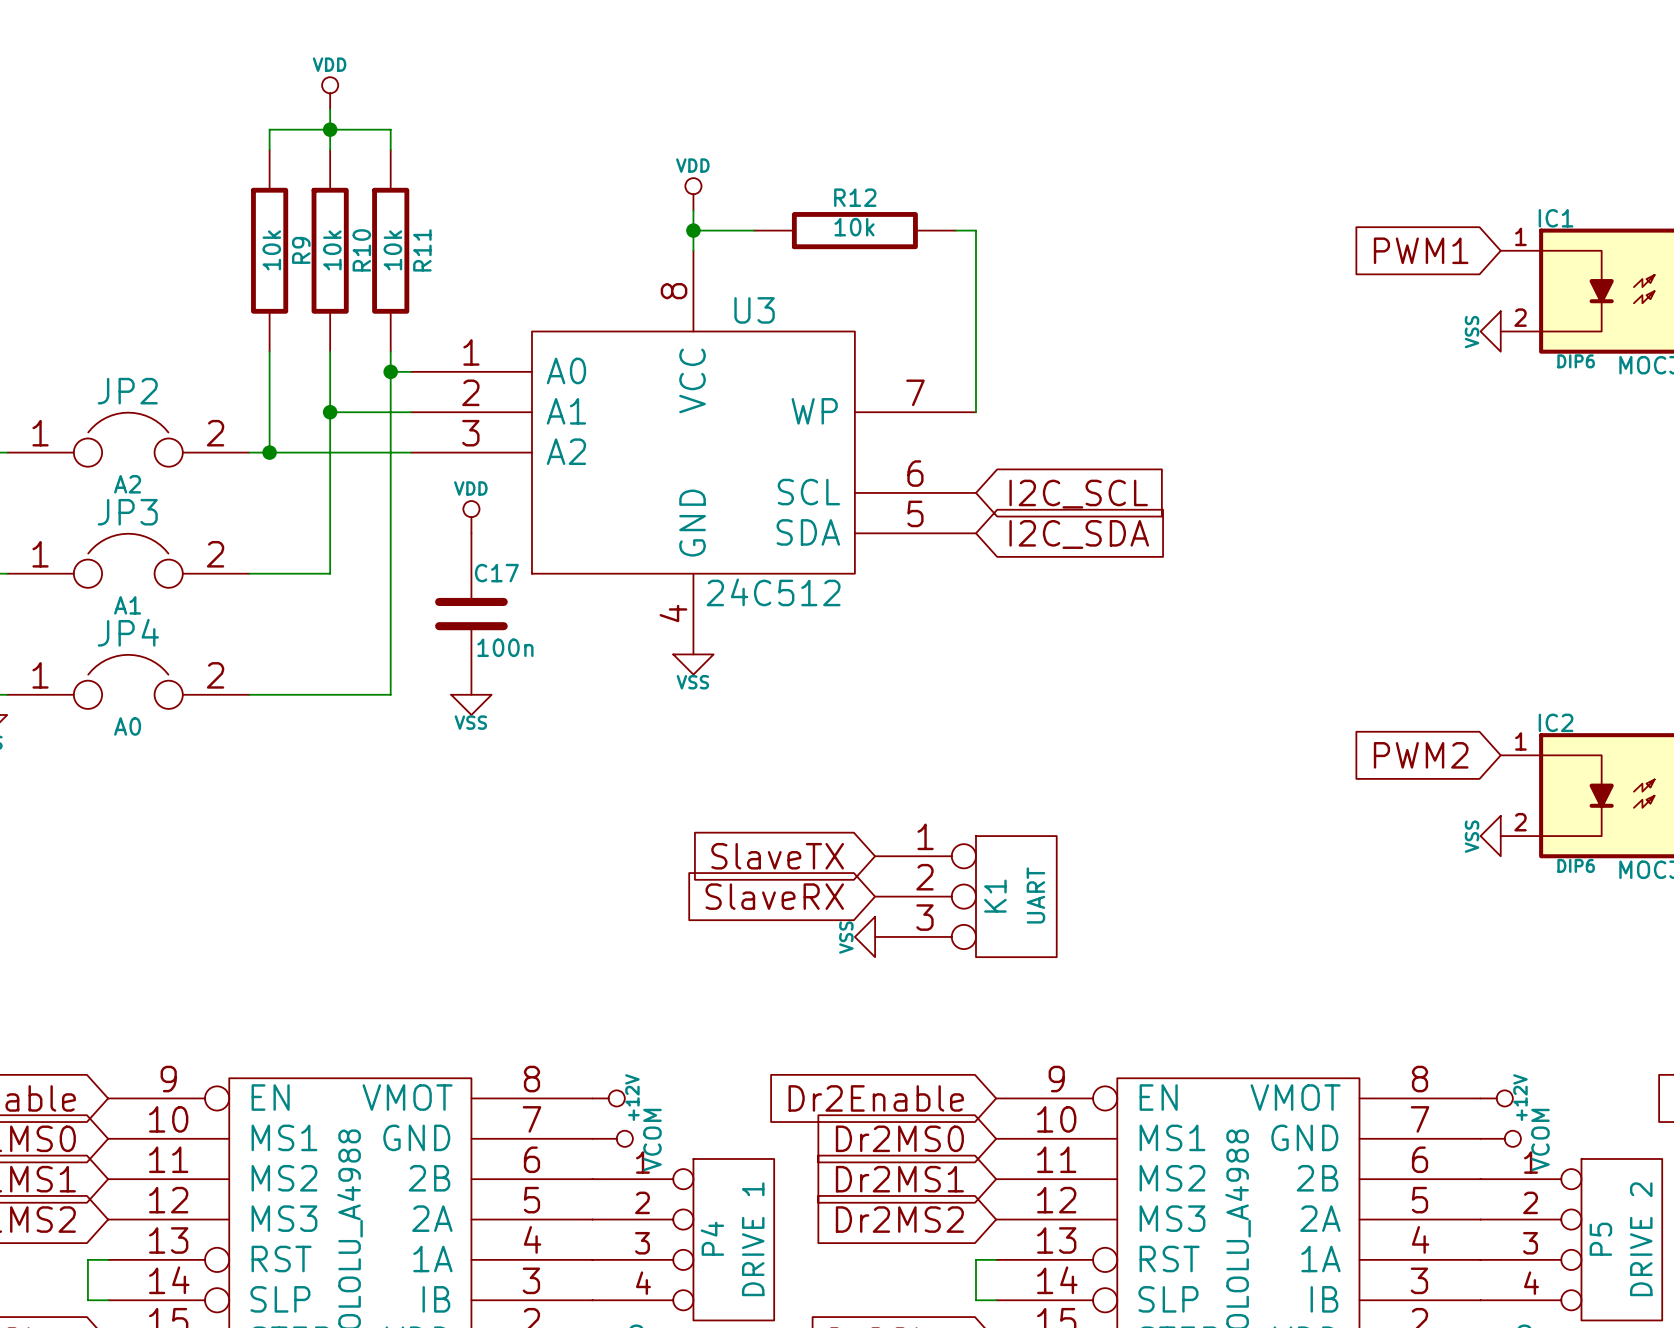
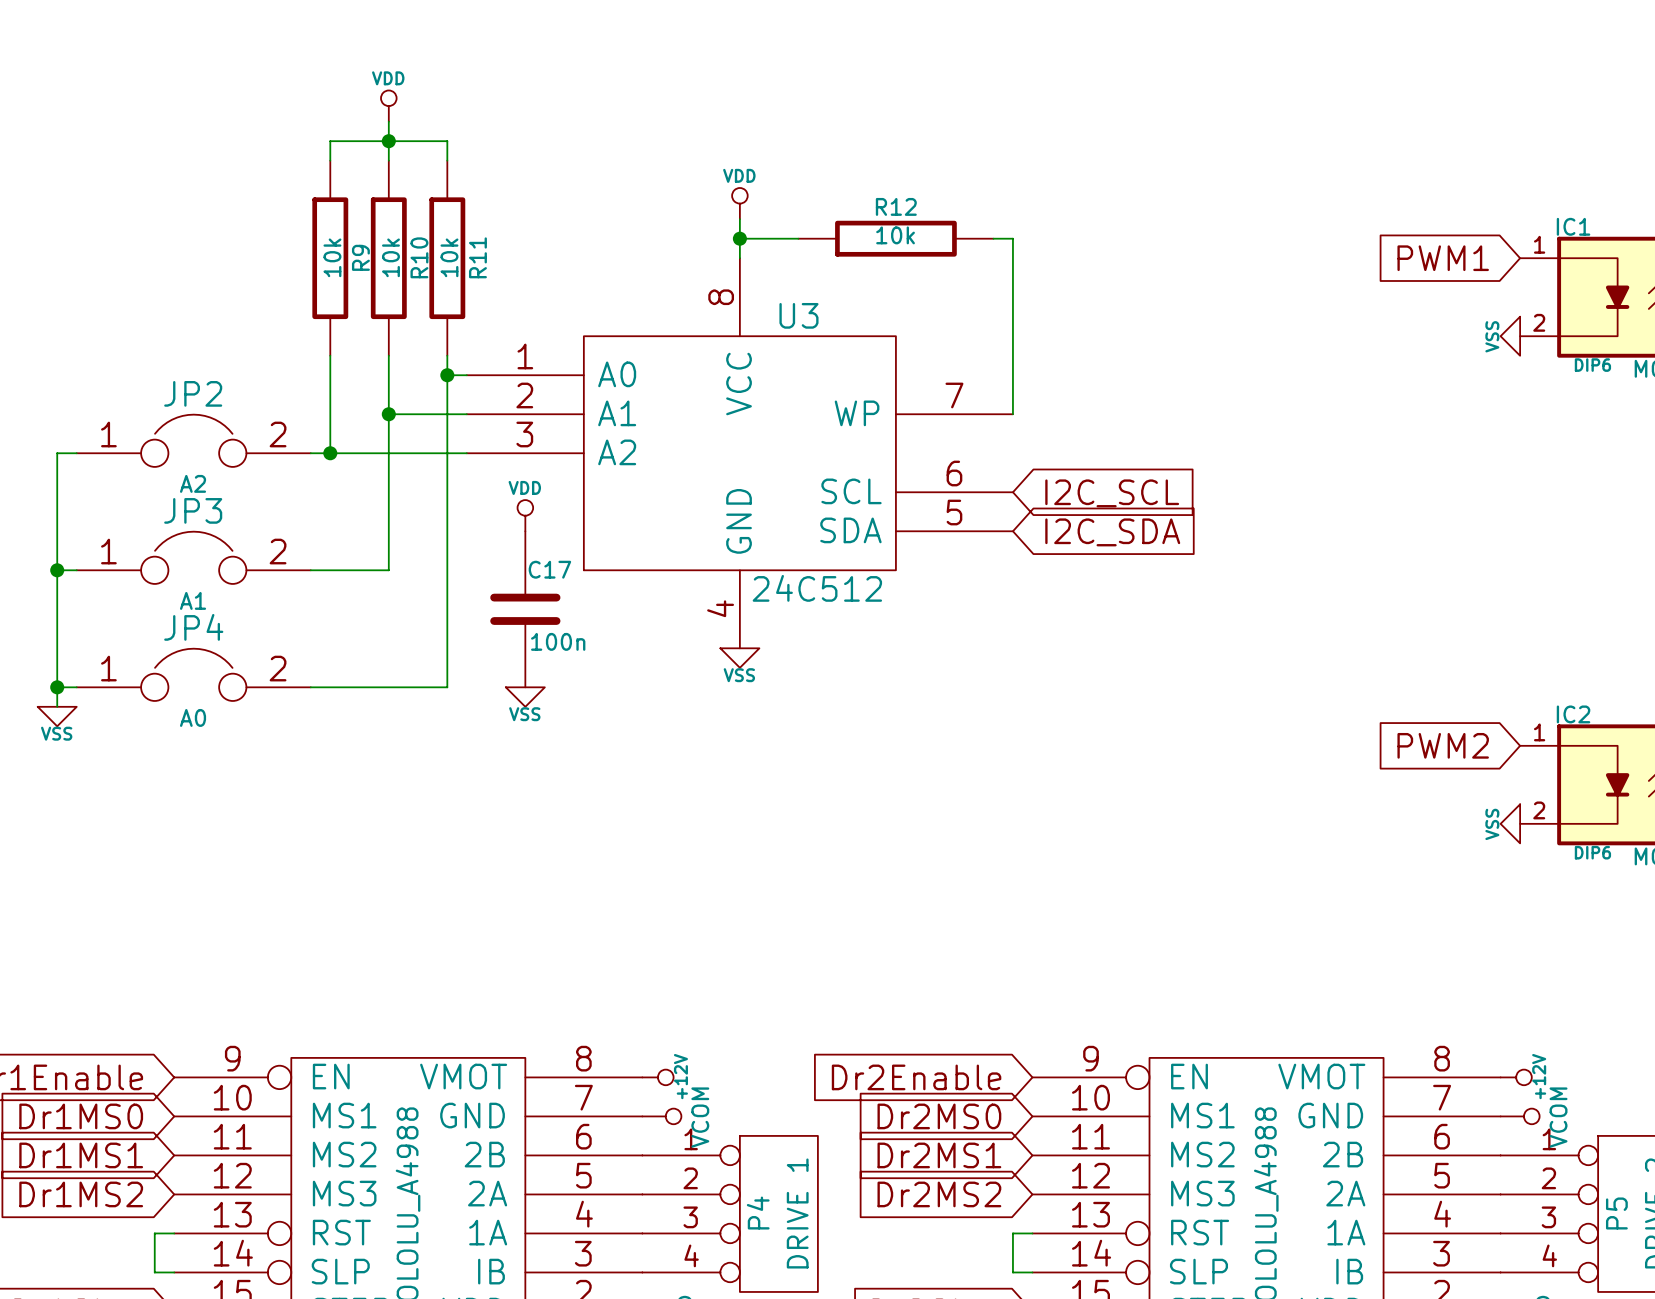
global label: SlaveTX (777, 856) -> none
global label: SlaveRX (774, 896) -> none
K1: UART (965, 896) -> none
power symbol: VSS (864, 936) -> none

